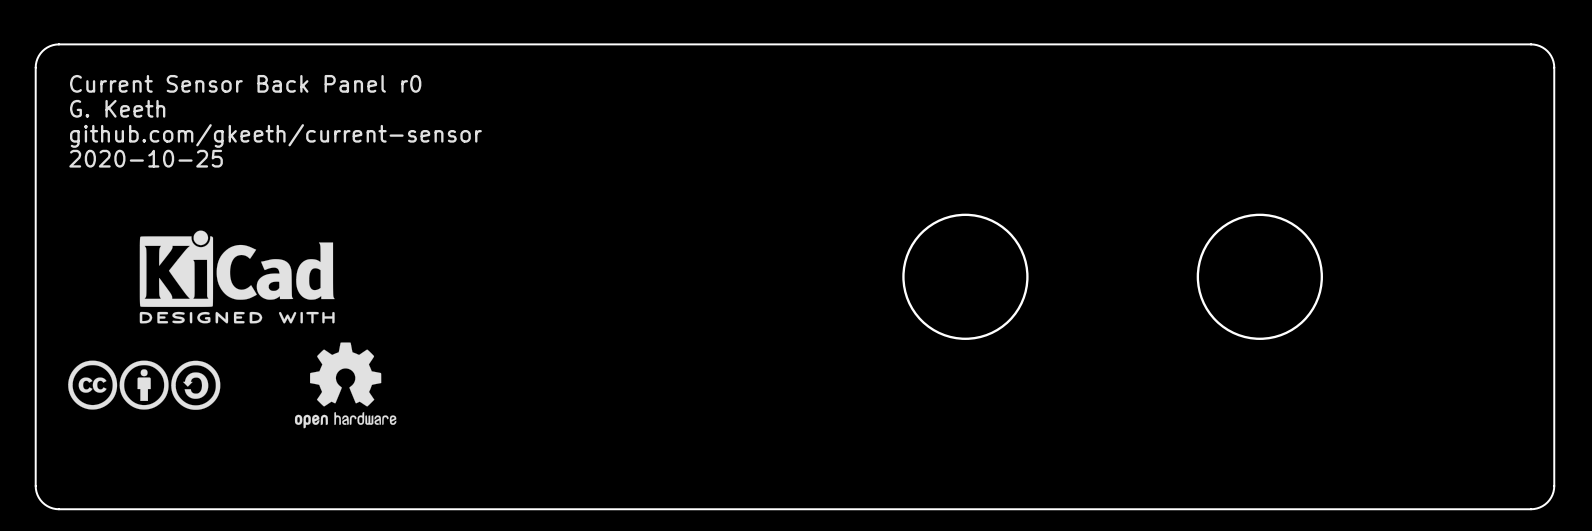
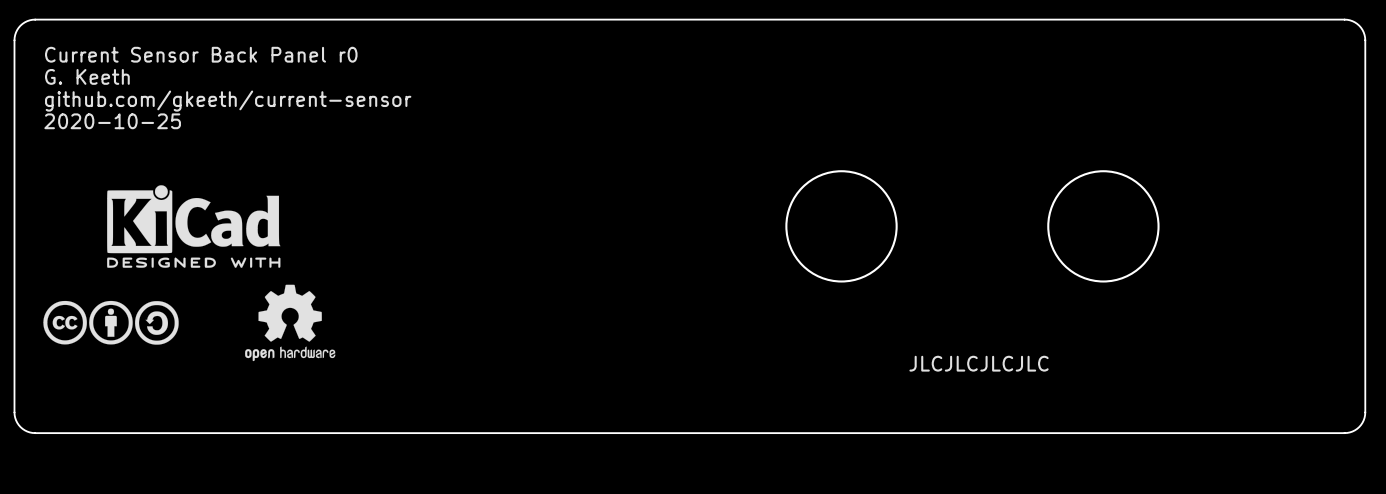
text: none -> JLCJLCJLCJLC (979, 363)

